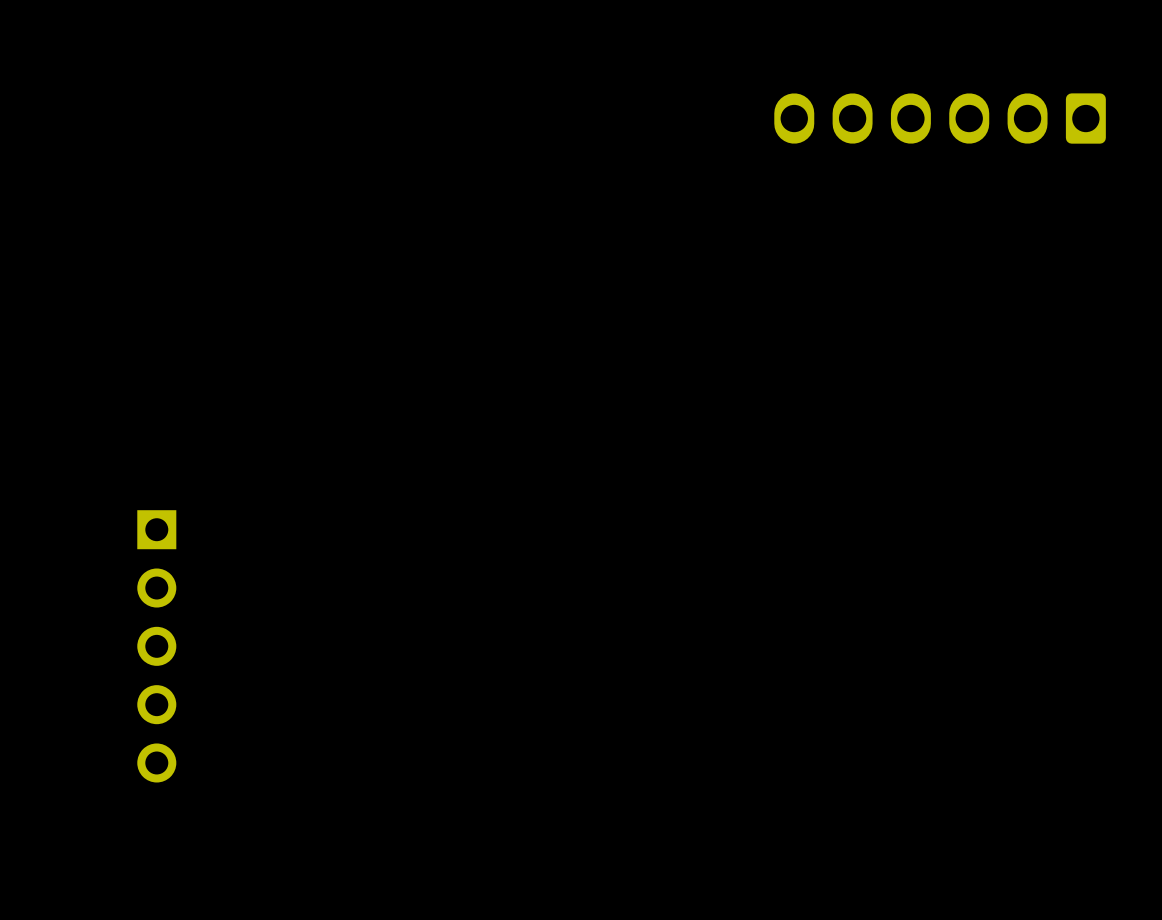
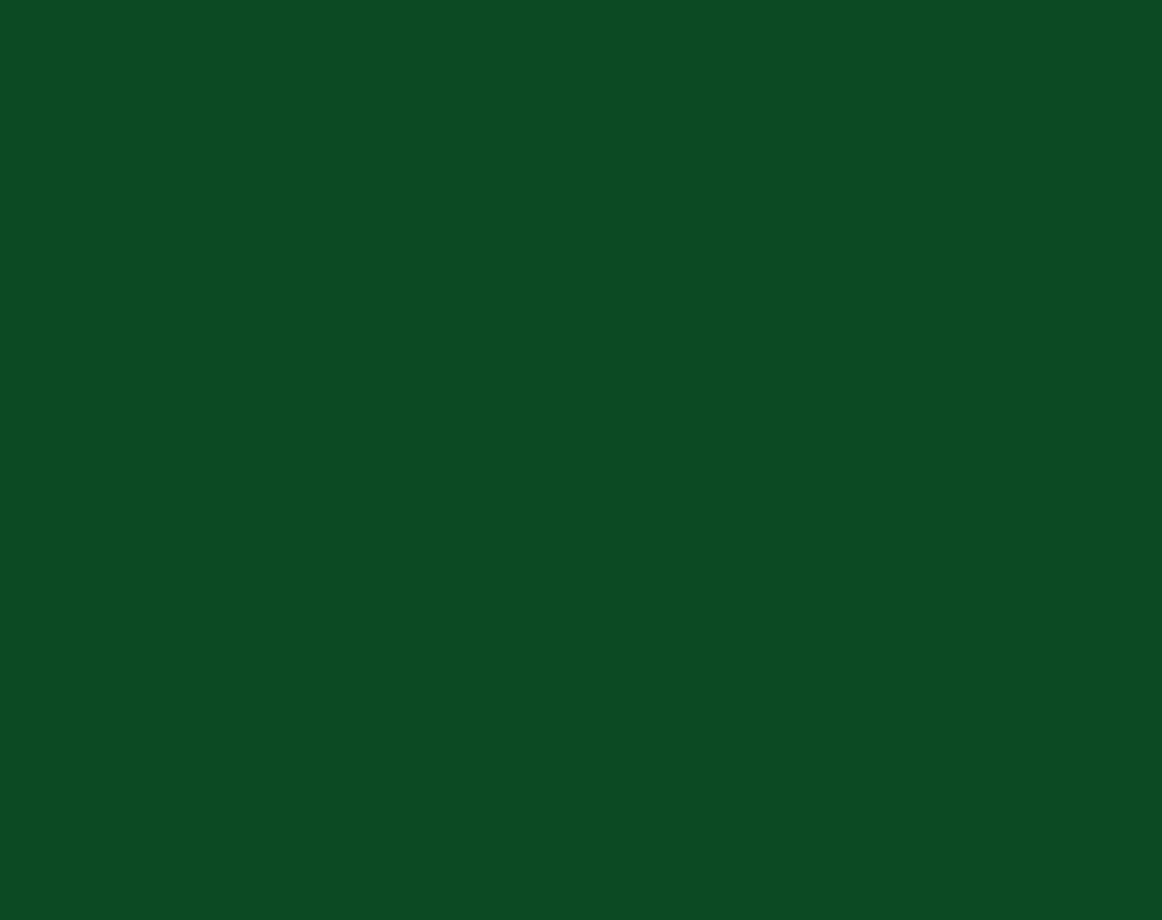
part: (940, 118) -> none
part: (156, 646) -> none

